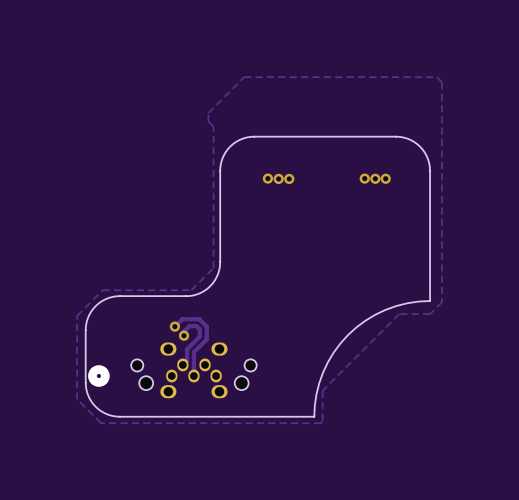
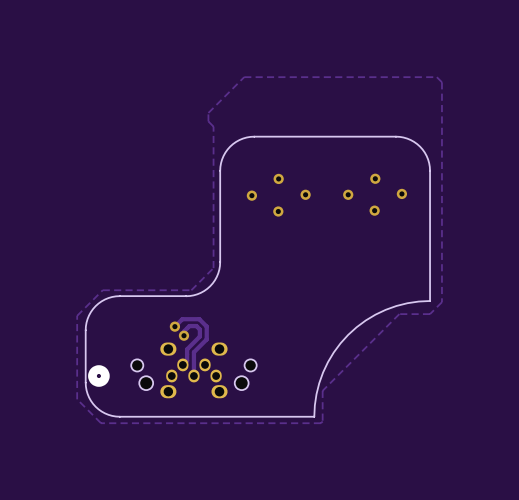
via: (267, 178) -> none
via: (289, 178) -> none
via: (364, 178) -> none
via: (385, 178) -> none
via: none -> (401, 193)
via: none -> (305, 194)
via: none -> (348, 194)
via: none -> (251, 195)
via: none -> (374, 210)
via: none -> (278, 211)

